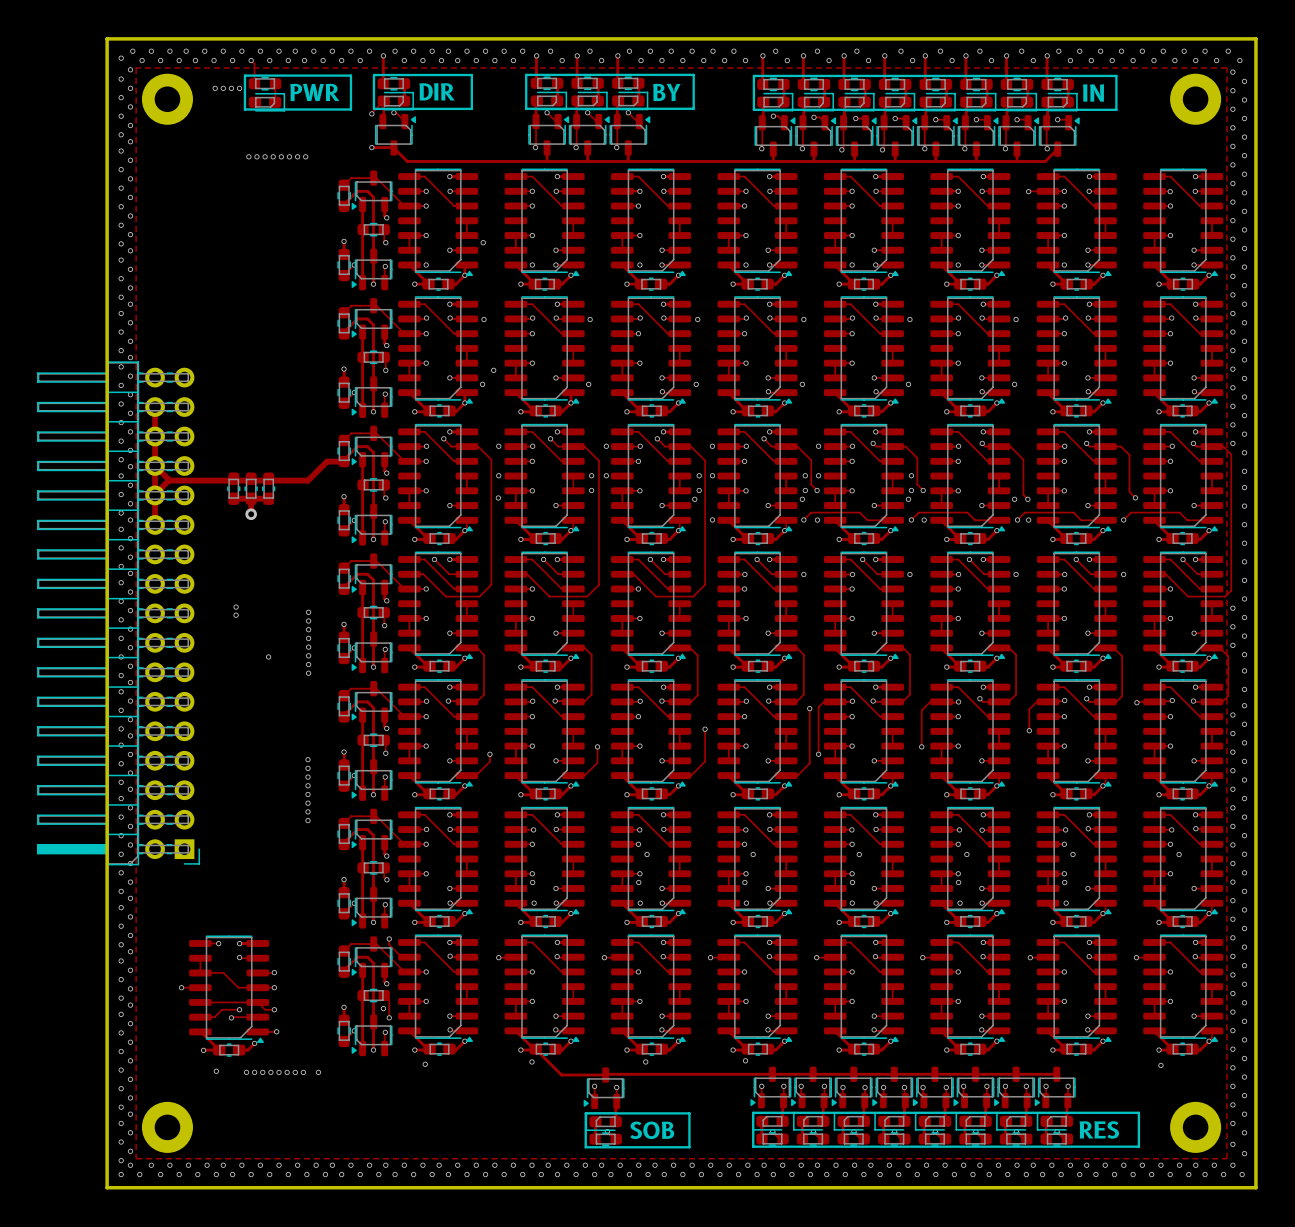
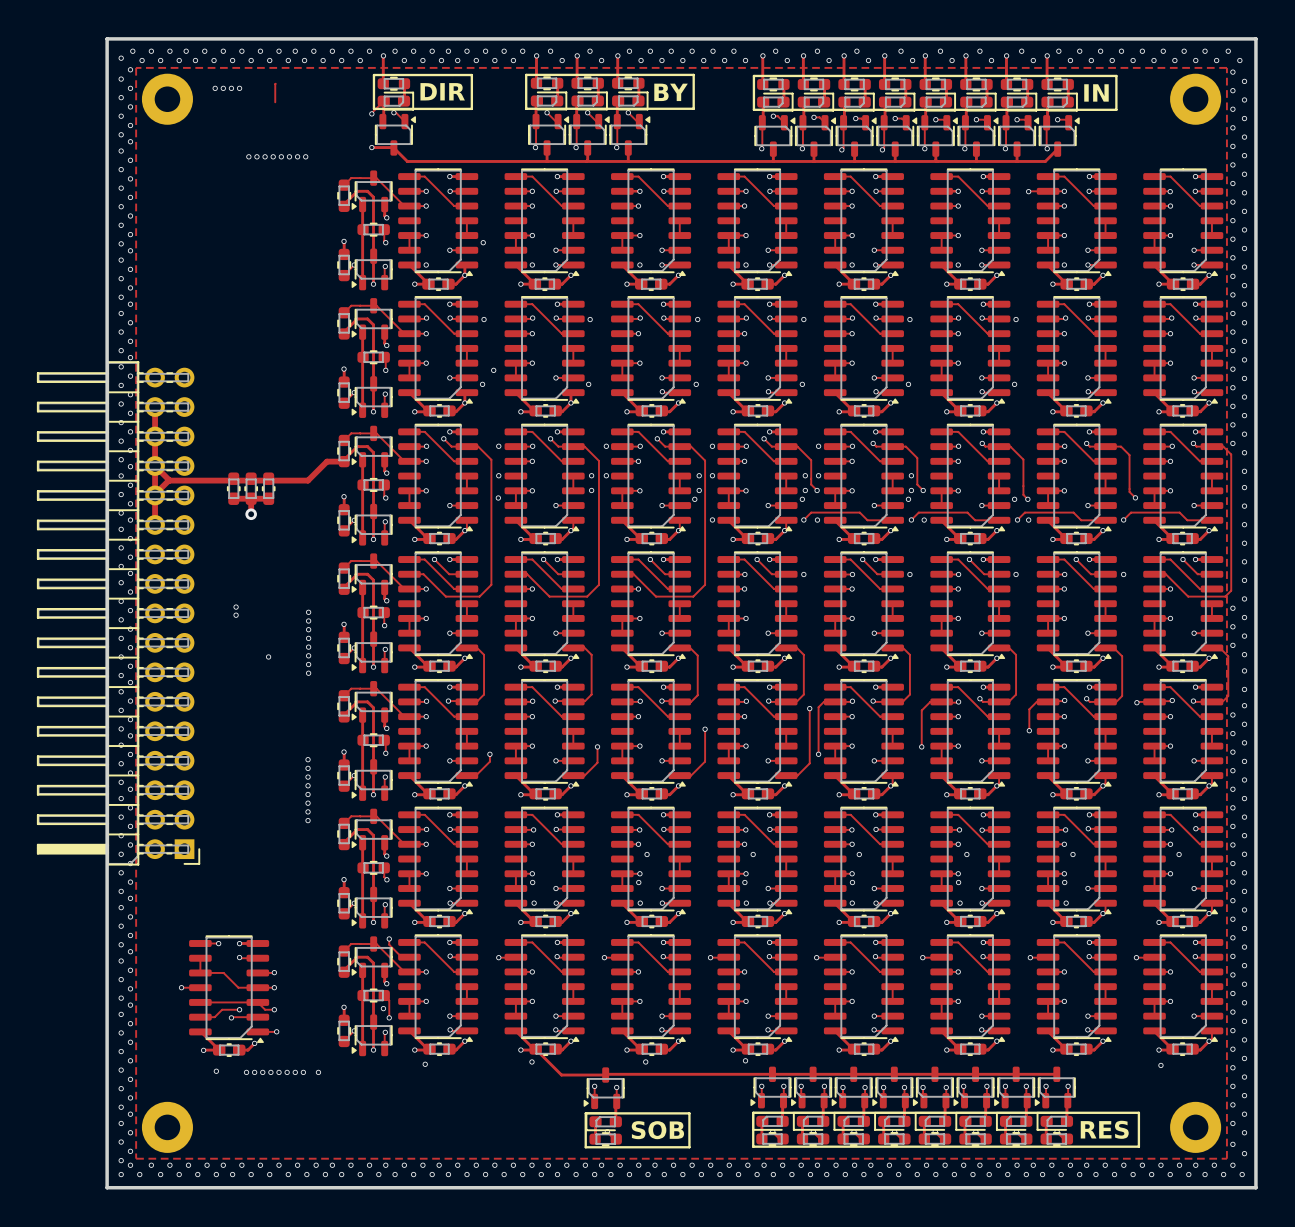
track: (251, 60) (254, 63) (254, 83) -> none
line: (244, 75) (350, 75) (350, 109) (244, 109) (244, 75) -> none
part: (265, 83) -> none
text: PWR (314, 92) -> none
part: (266, 102) -> none

